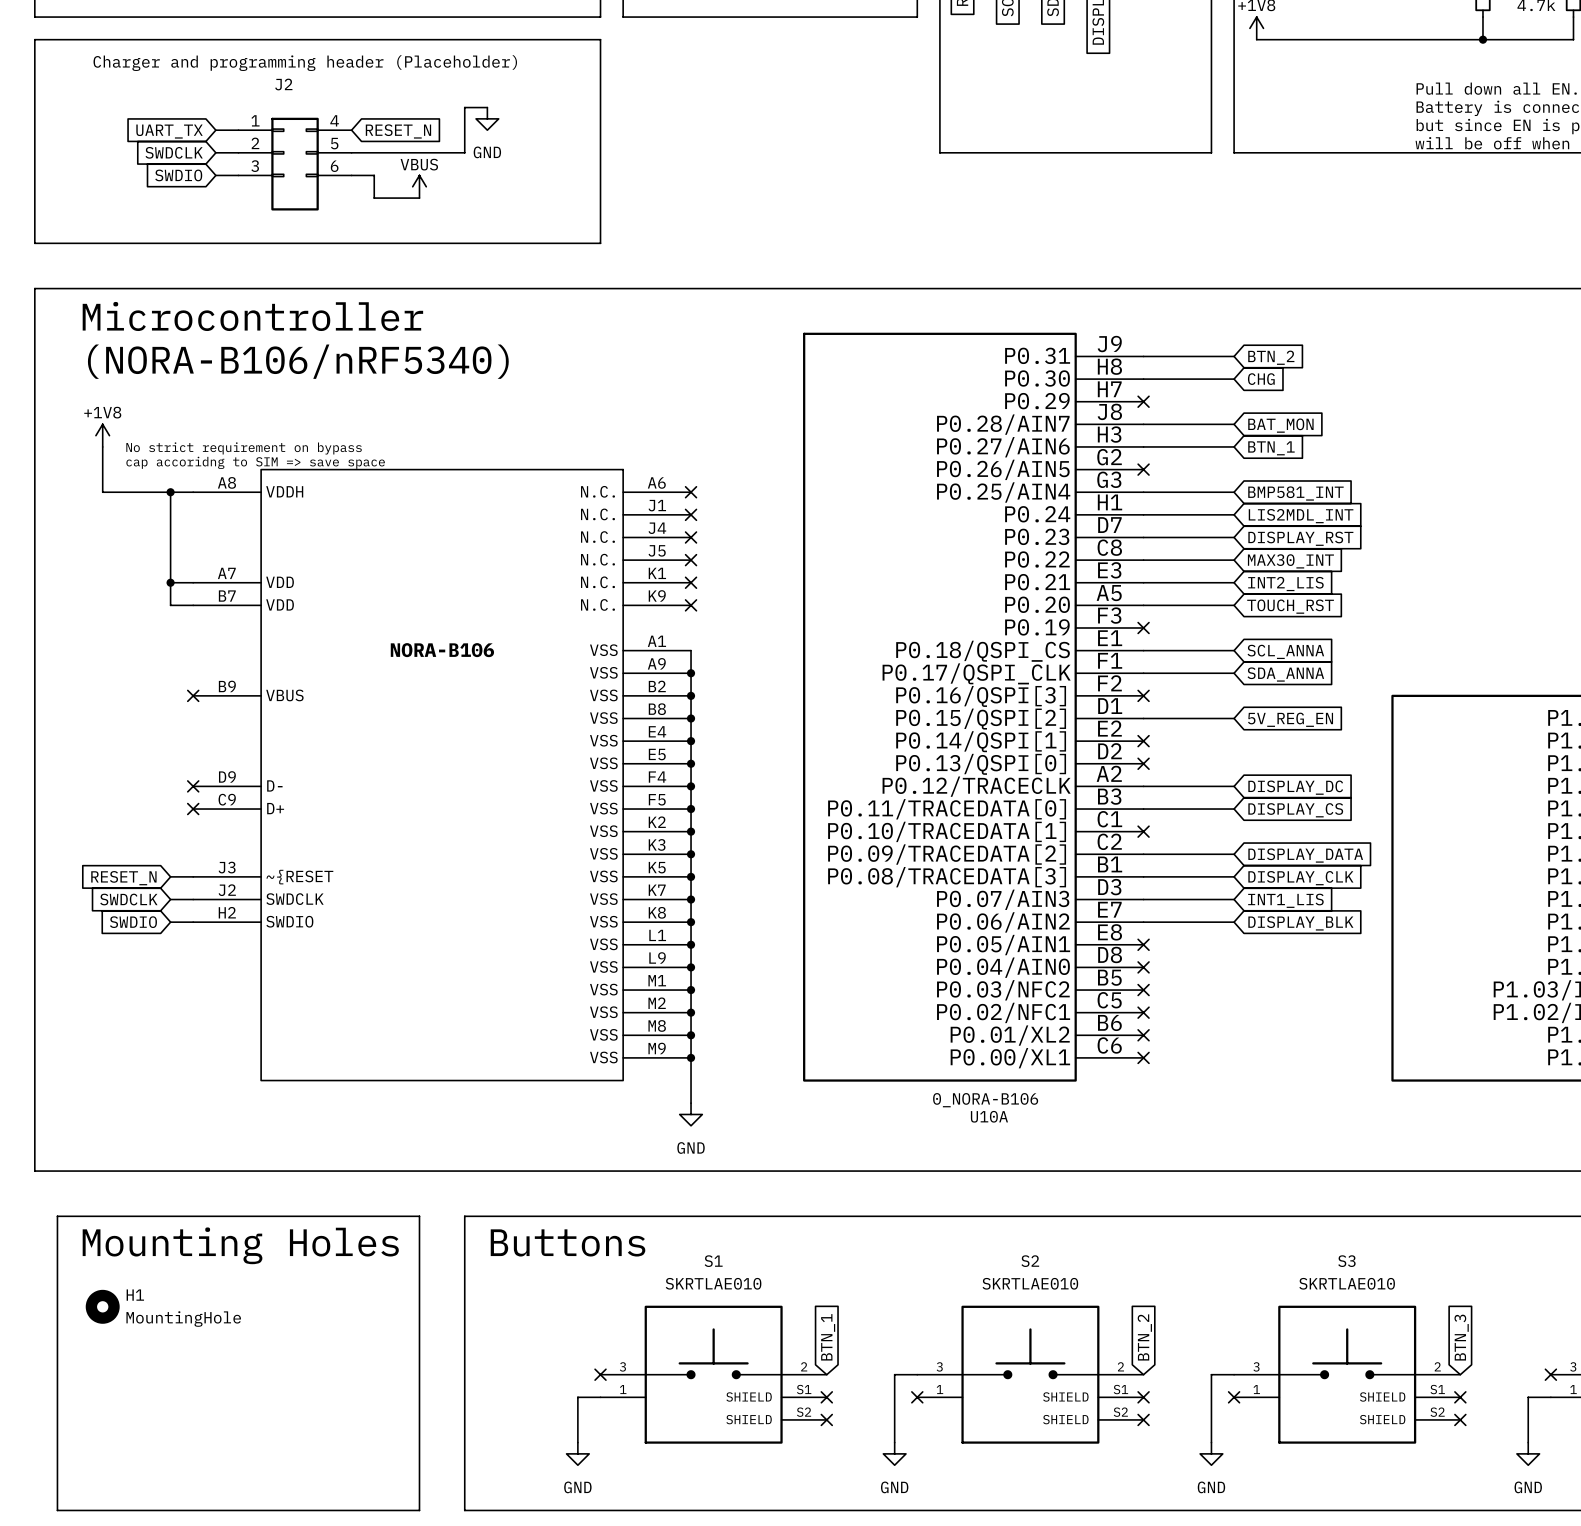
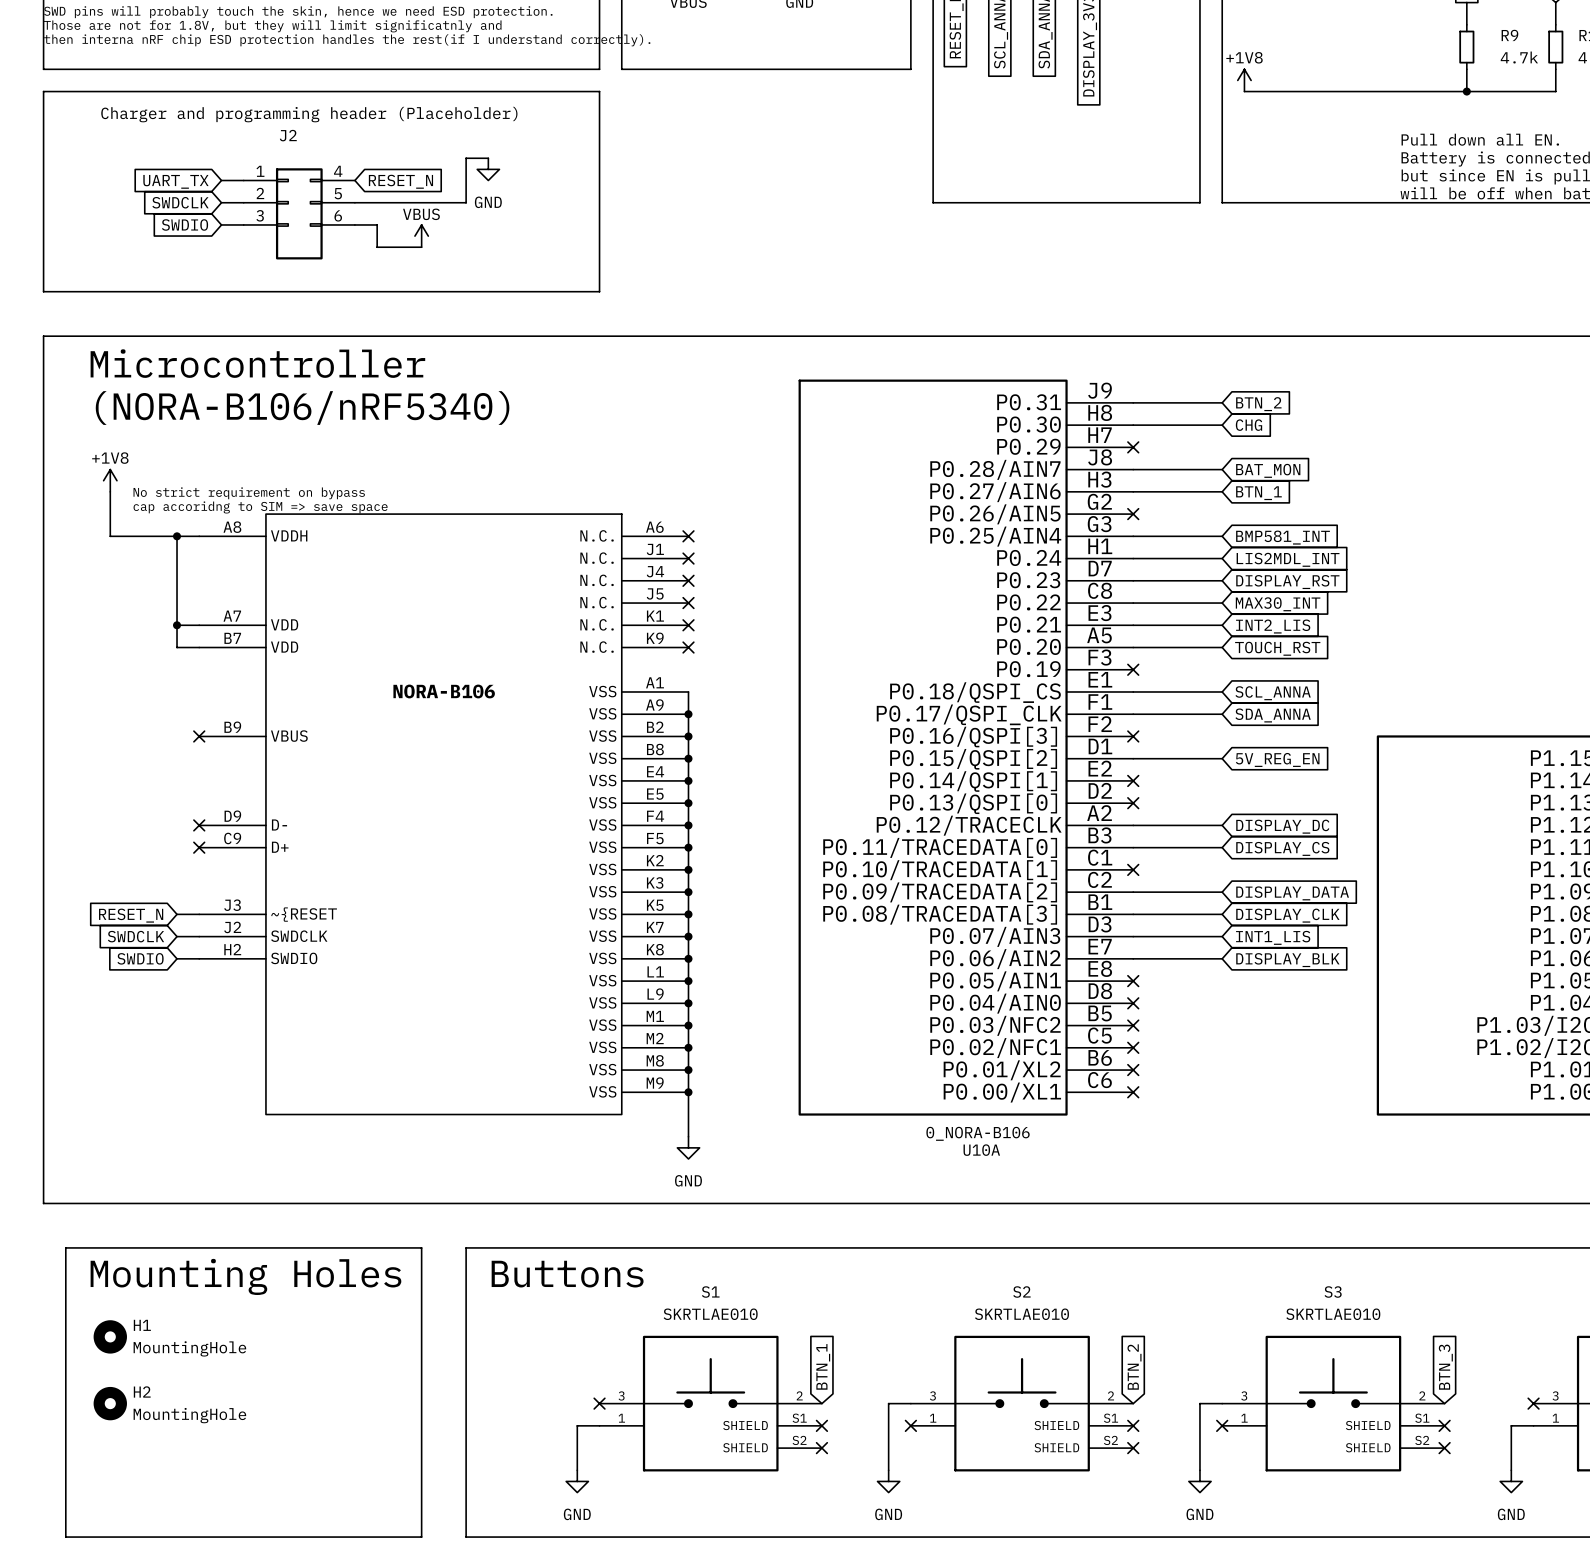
H2: none -> MountingHole (110, 1403)

